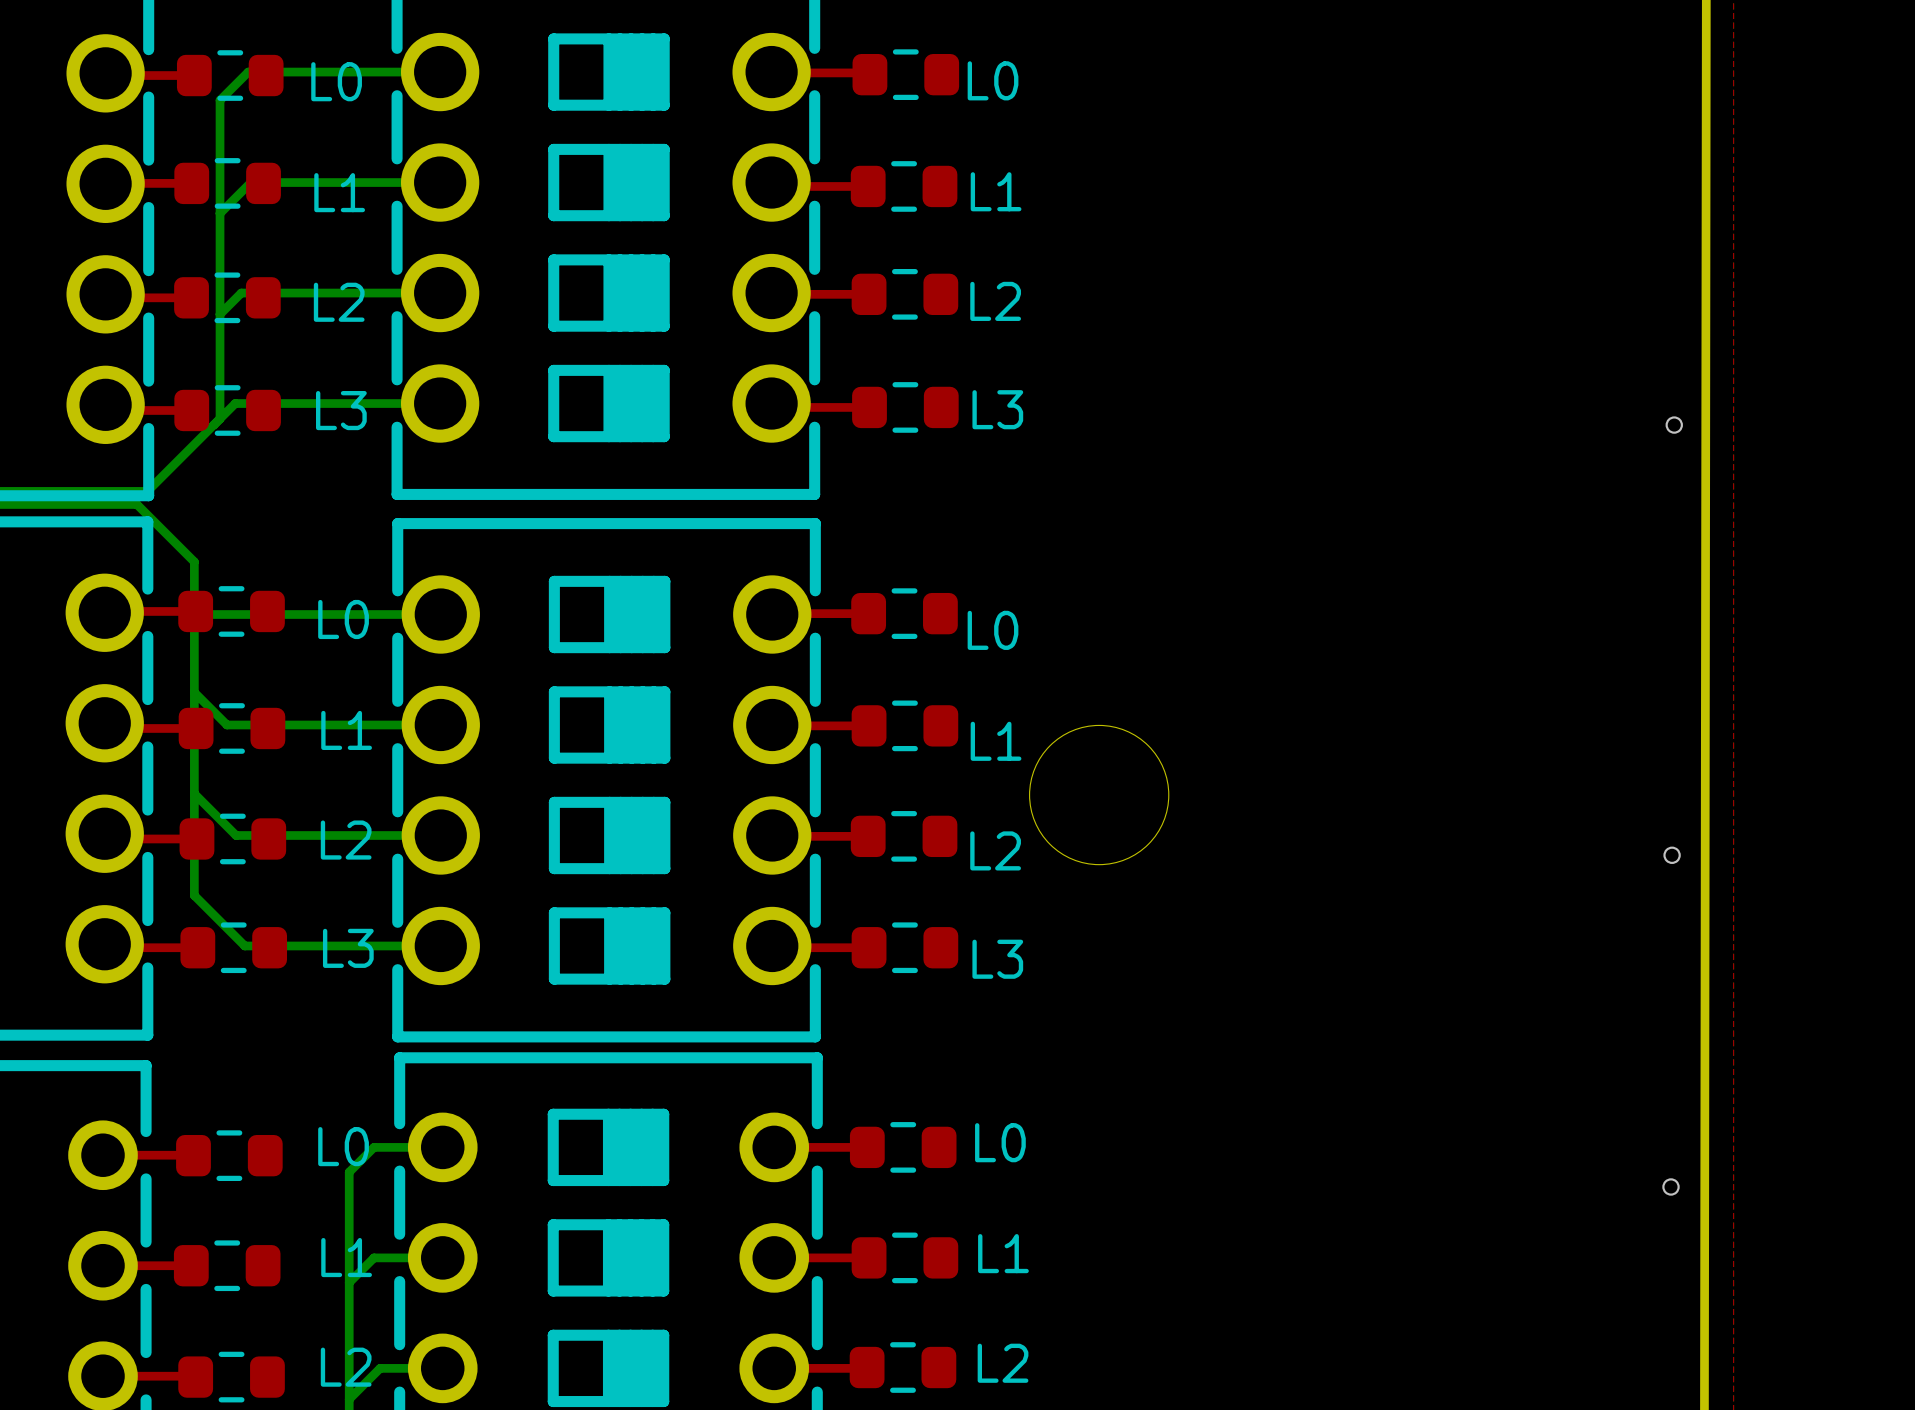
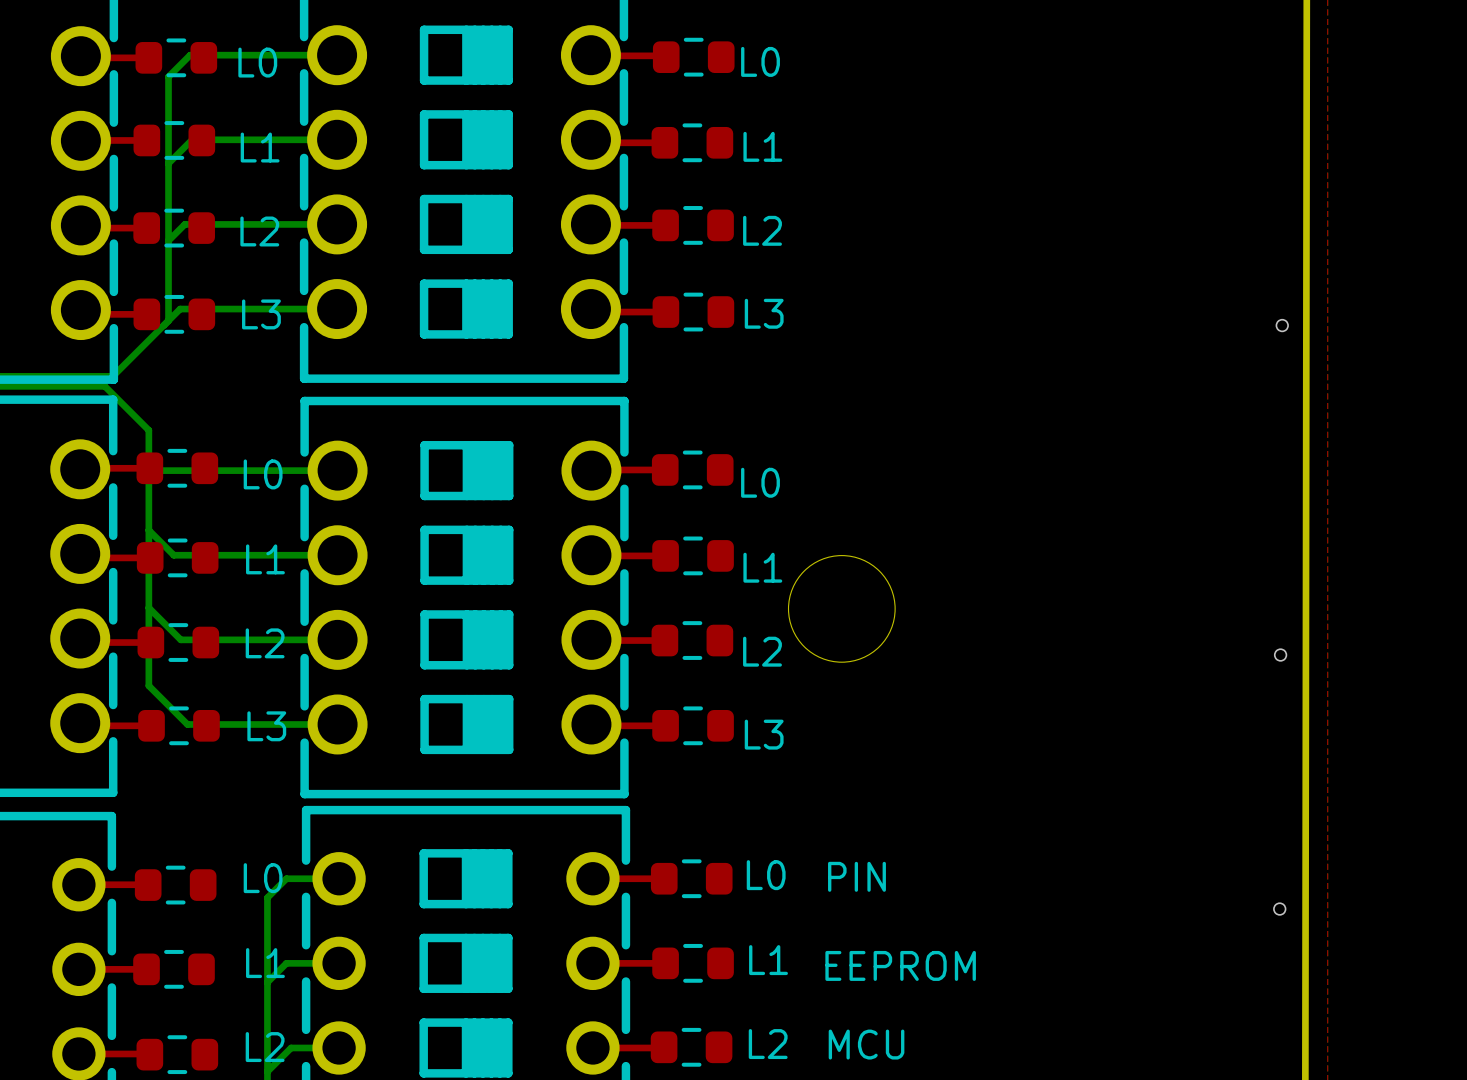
text: none -> PIN (856, 876)
text: none -> EEPROM (900, 965)
text: none -> MCU (866, 1044)

